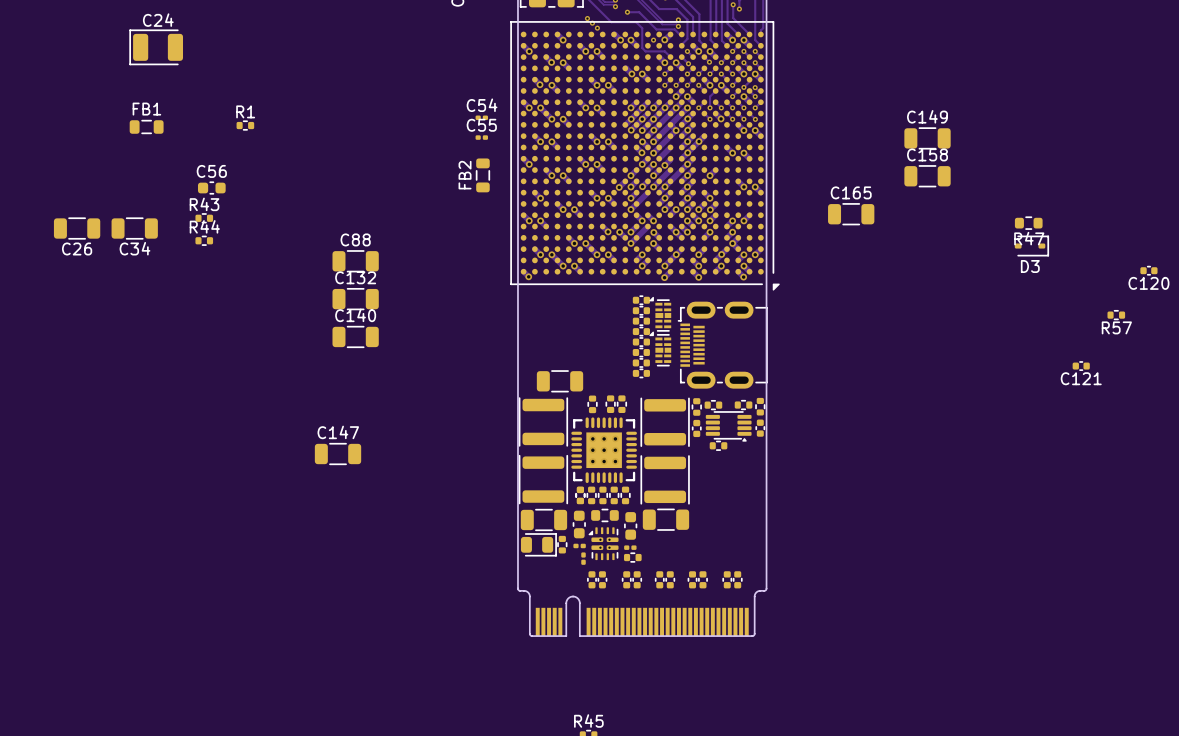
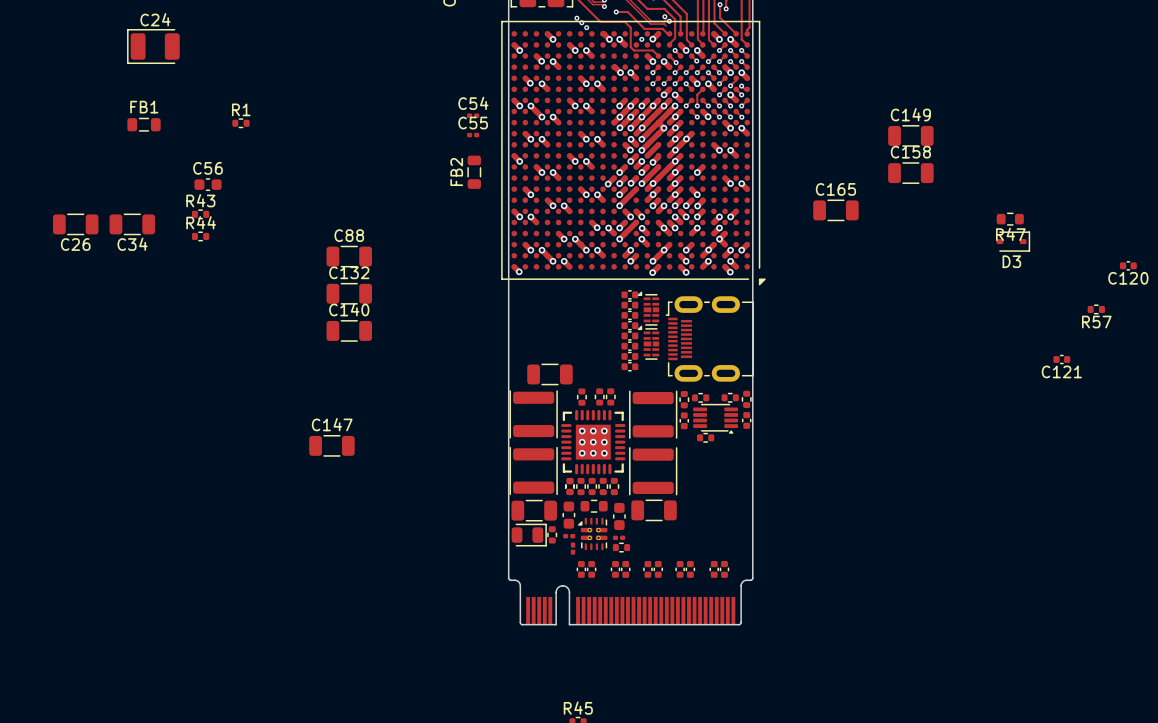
via: none -> (664, 16)
via: (678, 19) -> none
via: none -> (669, 21)
via: (678, 26) -> none

